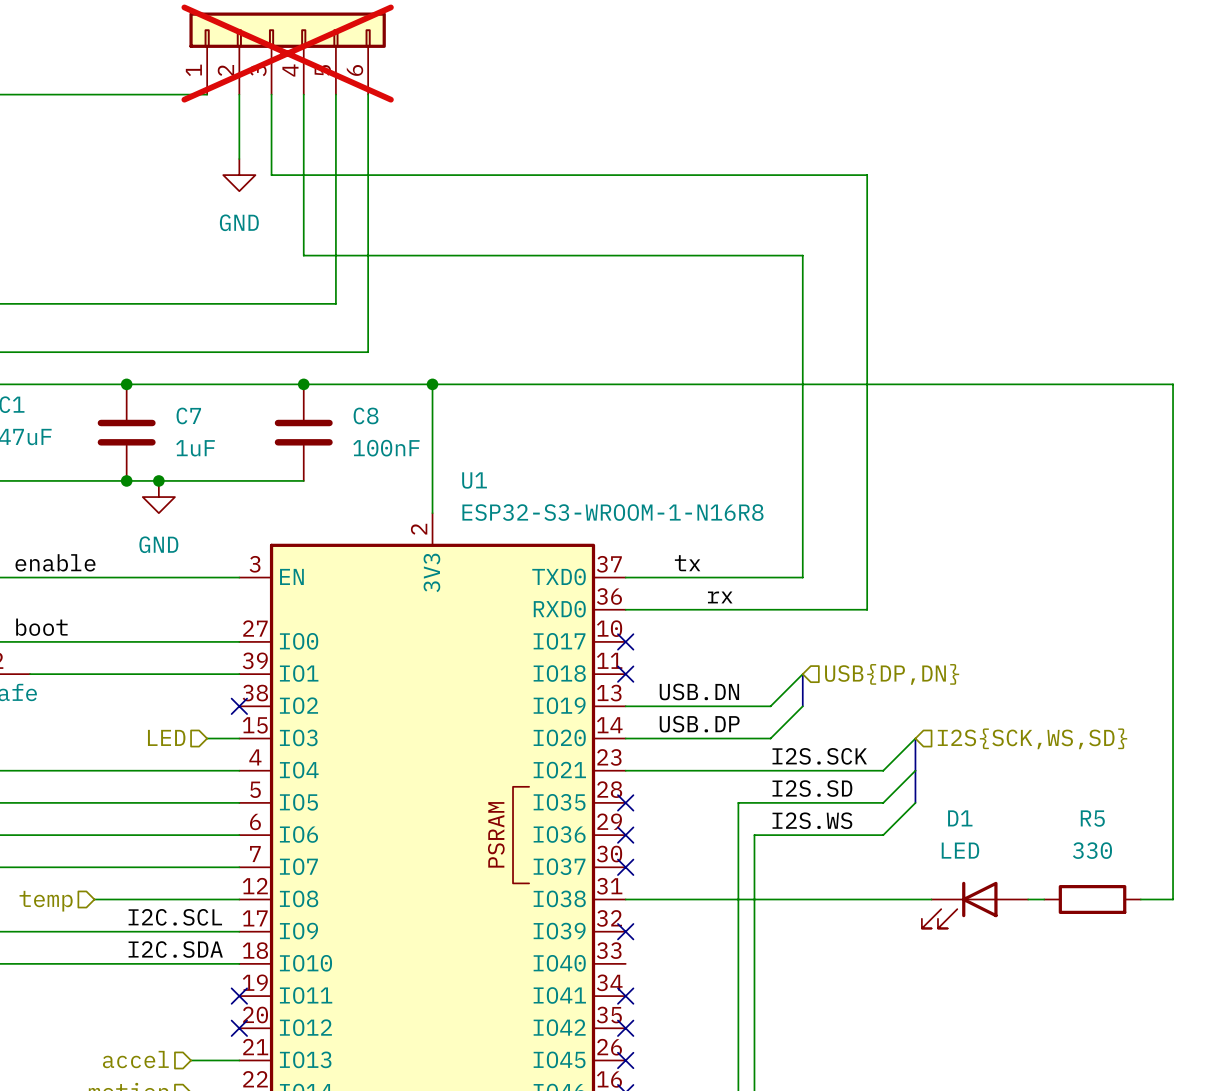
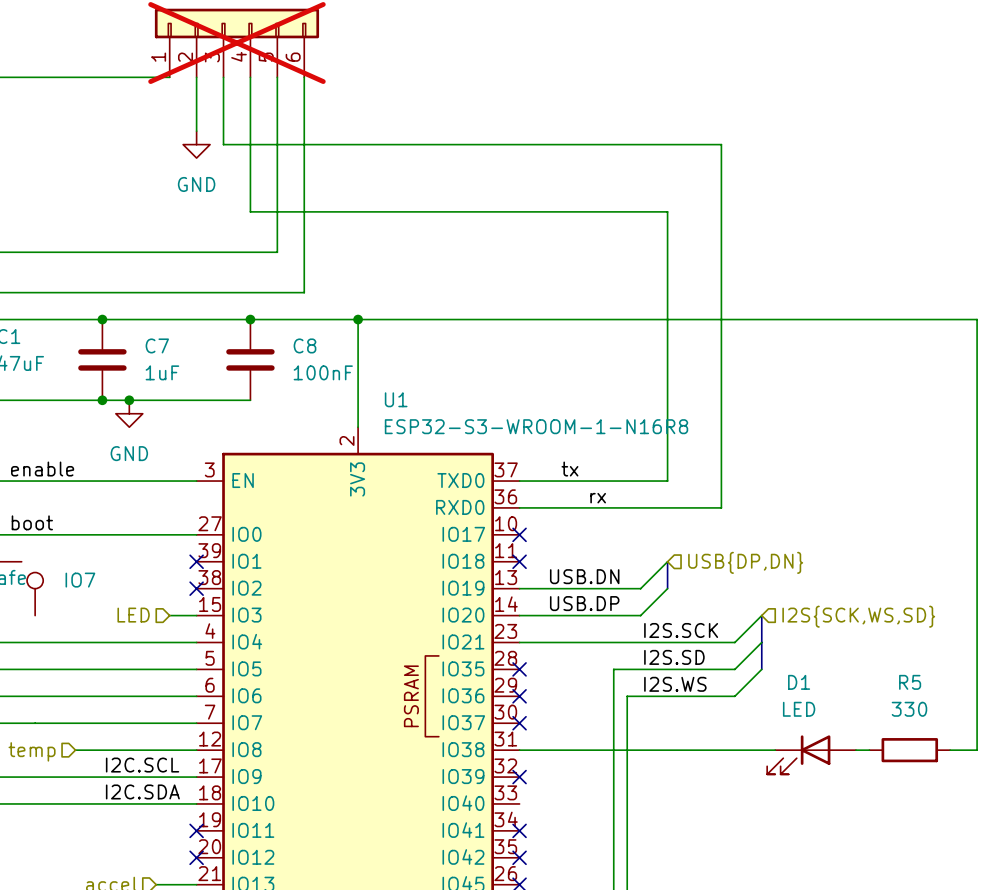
wire: (30, 674) (239, 674) -> none
no-connect mark: none -> (196, 561)
part: none -> (35, 594)

